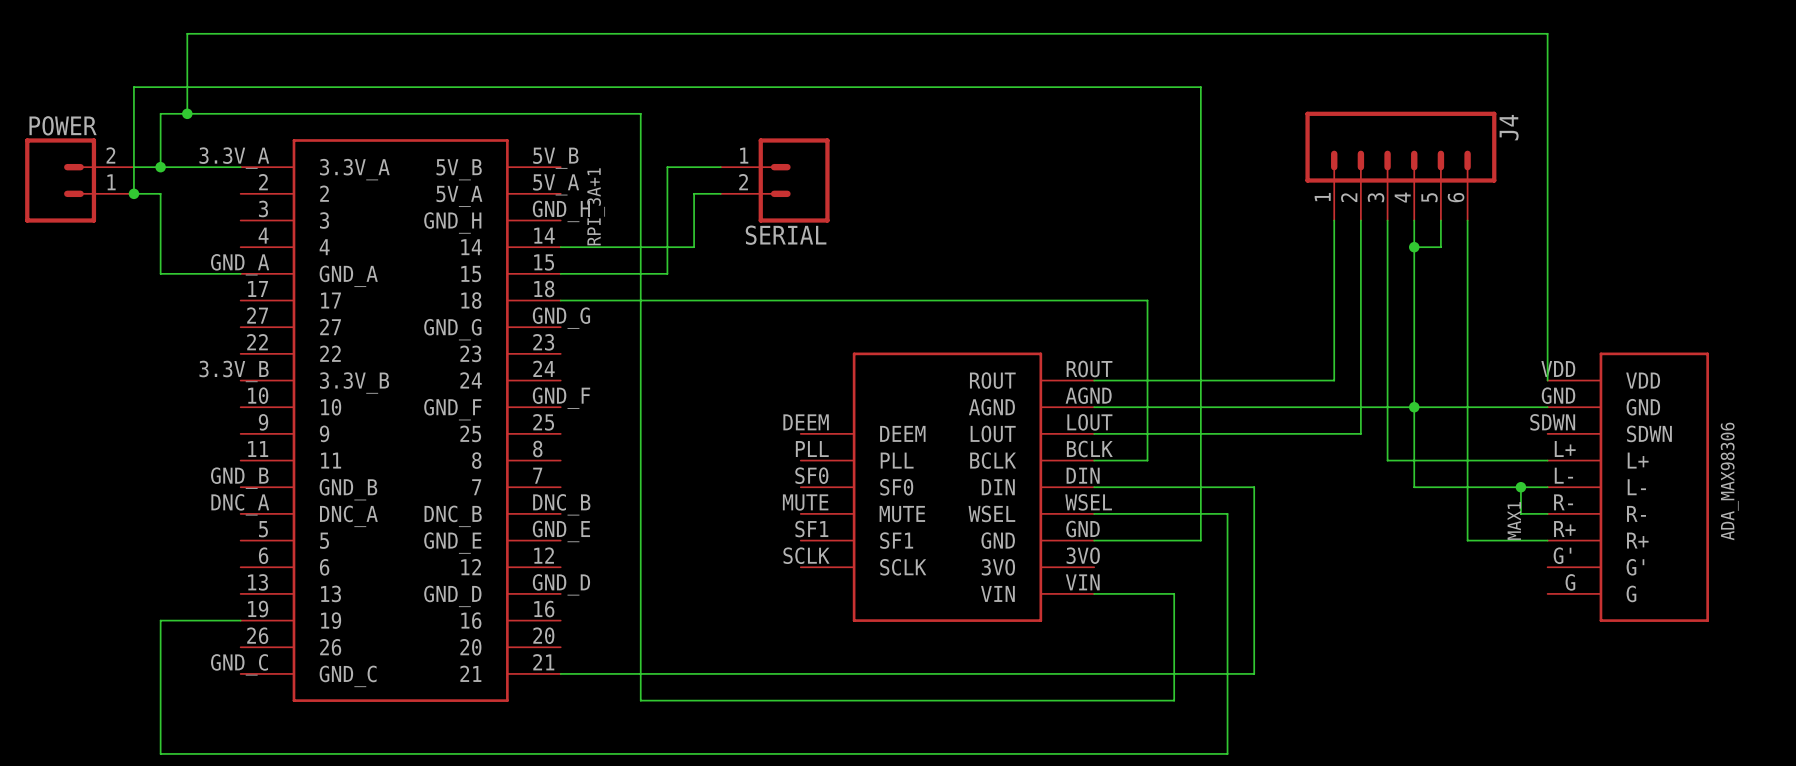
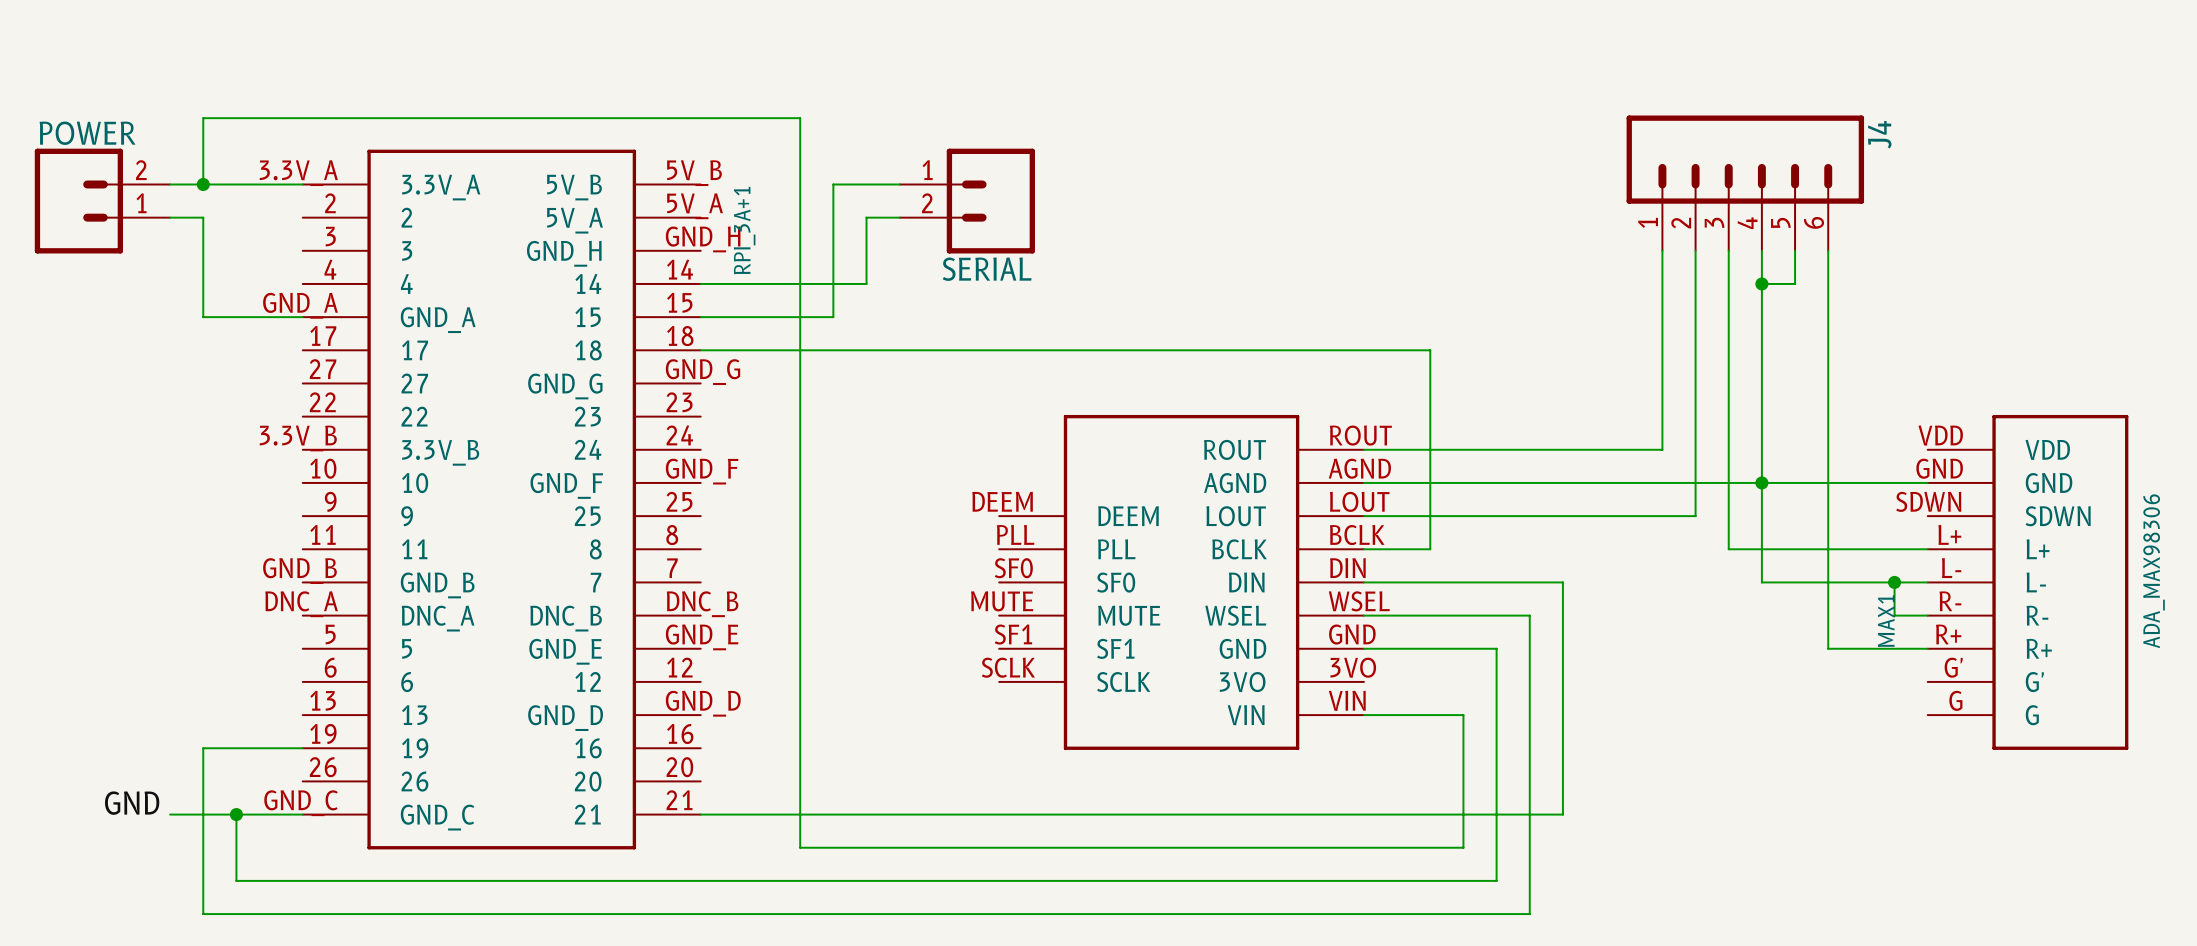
wire: (187, 113) (187, 33) (1547, 33) (1547, 380) -> none
junction: (187, 113) -> none
wire: (133, 193) (133, 87) (1200, 87) (1200, 540) -> (236, 814) (236, 880) (1496, 880) (1496, 648)
junction: (133, 193) -> none
label: none -> GND (132, 803)
wire: none -> (170, 814) (302, 814)
junction: none -> (236, 814)

